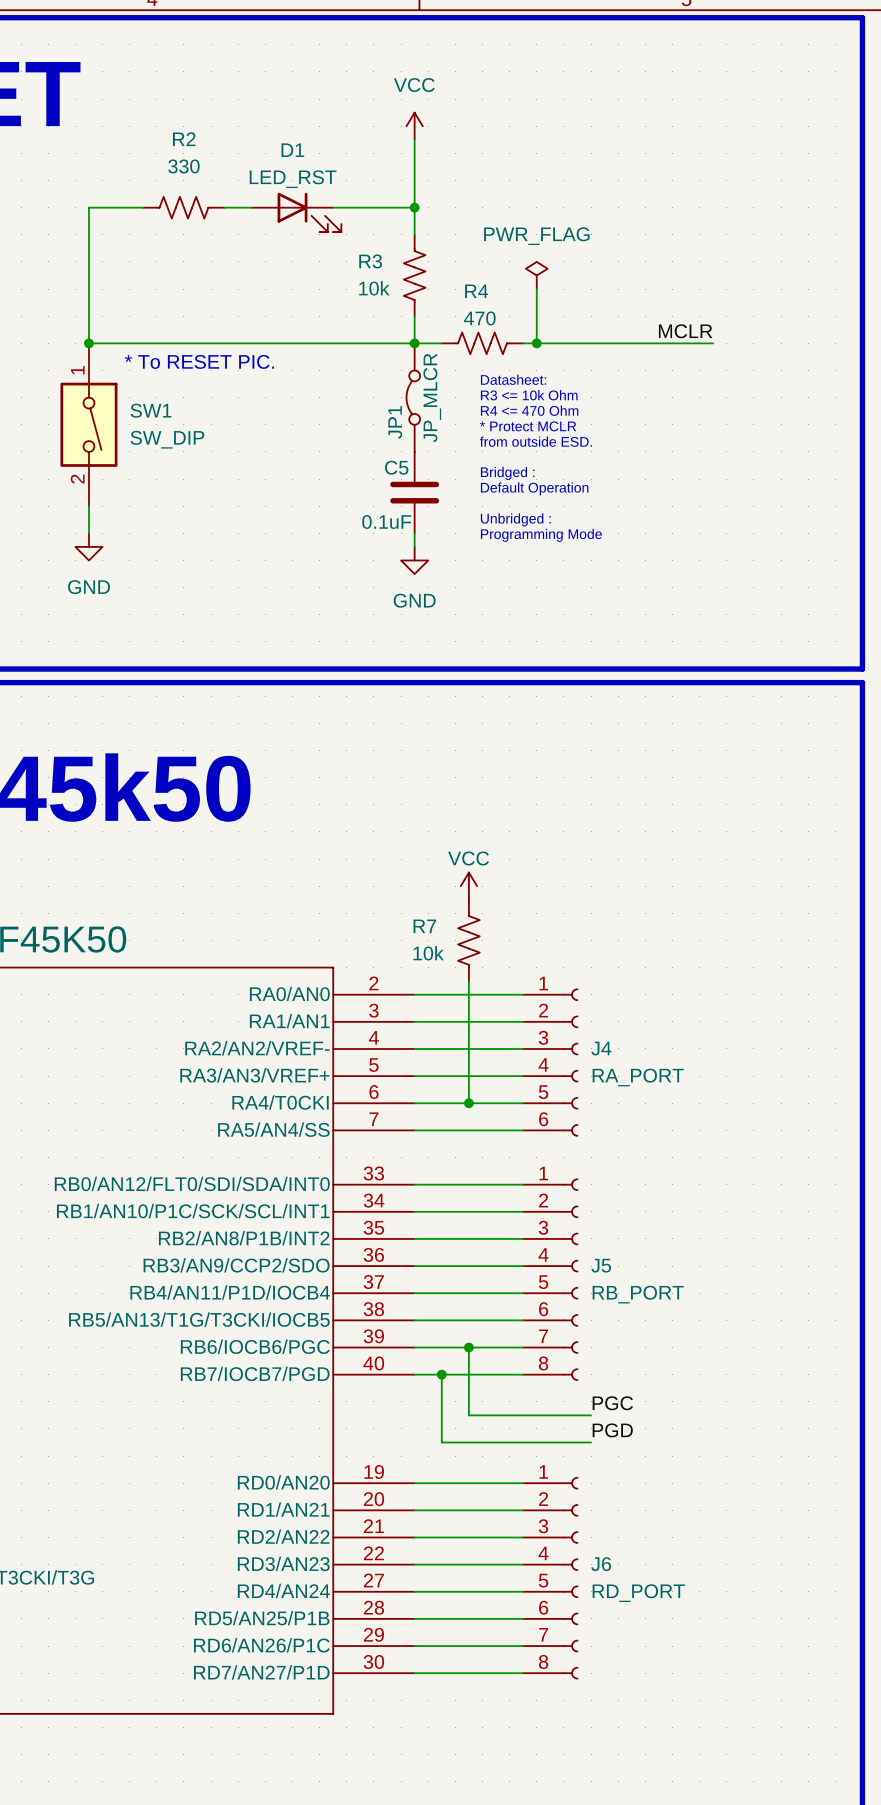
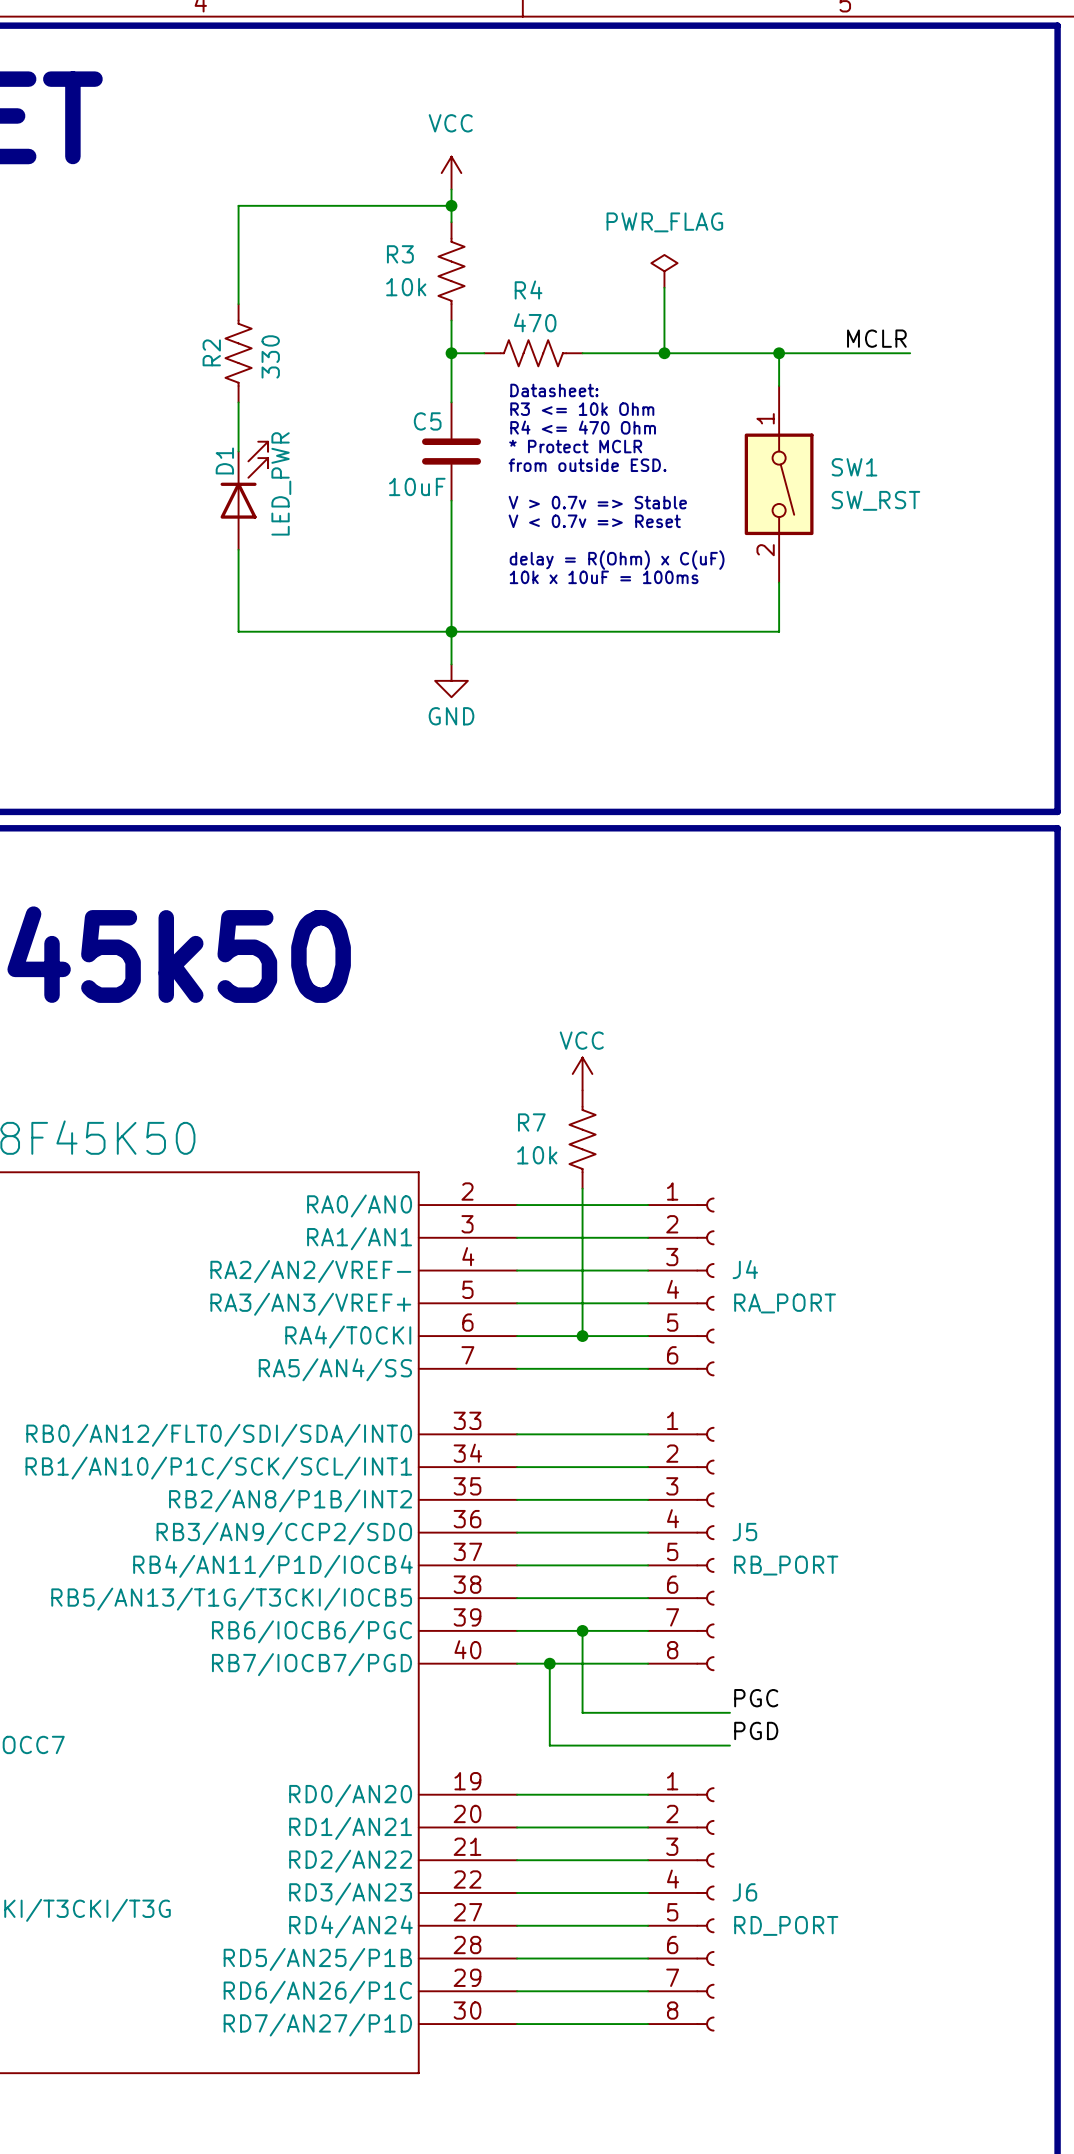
power symbol position: VCC (414, 126) -> VCC (451, 173)
R2 name position: R2 (184, 139) -> R2 (211, 352)
wire: (414, 139) (414, 234) -> none
D1 name position: D1 (292, 150) -> D1 (224, 460)
wire: none -> (451, 205) (238, 205) (238, 304)
junction: none -> (451, 205)
D1 value: LED_RST (293, 179) -> LED_PWR (281, 483)
wire: (143, 207) (88, 207) (88, 343) (441, 343) -> none
R2 rotation: 0° (183, 207) -> 90° clockwise (238, 353)
R2 position: (183, 207) -> (238, 353)
wire: (224, 207) (251, 207) -> (451, 353) (484, 353)
wire: (333, 207) (414, 207) -> none
junction: (414, 207) -> none
D1 position: (296, 212) -> (244, 495)
D1 rotation: 0° (309, 212) -> 90° counterclockwise (244, 480)
wire: none -> (451, 320) (451, 402)
R3 position: (414, 275) -> (451, 271)
power symbol position: PWR_FLAG (536, 275) -> PWR_FLAG (664, 271)
junction: none -> (451, 353)
wire: none -> (582, 353) (910, 353)
wire: (536, 289) (536, 343) -> (664, 353) (664, 287)
wire: none -> (779, 353) (779, 386)
junction: none -> (779, 353)
wire: (414, 316) (414, 343) -> (451, 189) (451, 222)
wire: none -> (238, 402) (238, 451)
label position: MCLR (685, 331) -> MCLR (876, 338)
junction: (88, 343) -> none
junction: (414, 343) -> none
R4 position: (482, 343) -> (533, 353)
wire: (523, 343) (713, 343) -> none
junction position: (536, 343) -> (664, 353)
text: * To RESET PIC. (199, 361) -> none
text position: Datasheet: (513, 379) -> Datasheet: (554, 390)
text position: R3 <= 10k Ohm (529, 395) -> R3 <= 10k Ohm (582, 409)
JP1: JP_MLCR (413, 397) -> none
text position: R4 <= 470 Ohm (529, 410) -> R4 <= 470 Ohm (583, 427)
wire: none -> (451, 500) (451, 664)
text: none -> V > 0.7v => Stable (597, 502)
SW1 position: (88, 424) -> (779, 484)
text position: * Protect MCLR (528, 426) -> * Protect MCLR (575, 446)
text: none -> V < 0.7v => Reset (594, 521)
SW1 value: SW_DIP (167, 439) -> SW_RST (875, 500)
text position: from outside ESD. (535, 441) -> from outside ESD. (587, 465)
wire: none -> (238, 549) (238, 631) (779, 631) (779, 582)
text: none -> delay = R(Ohm) x C(uF) (617, 560)
text: Bridged : (507, 473) -> none
text: none -> 10k x 10uF = 100ms (604, 577)
text: Default Operation (534, 488) -> none
C5 position: (414, 492) -> (451, 451)
wire: (88, 506) (88, 533) -> none
junction: none -> (451, 631)
text: Unbridged : (515, 519) -> none
C5 value: 0.1uF (386, 521) -> 10uF (417, 486)
wire: (414, 533) (414, 546) -> none
text: Programming Mode (541, 535) -> none
power symbol: GND (88, 546) -> none
power symbol position: GND (414, 560) -> GND (451, 680)
power symbol text position: GND (414, 600) -> GND (451, 716)

